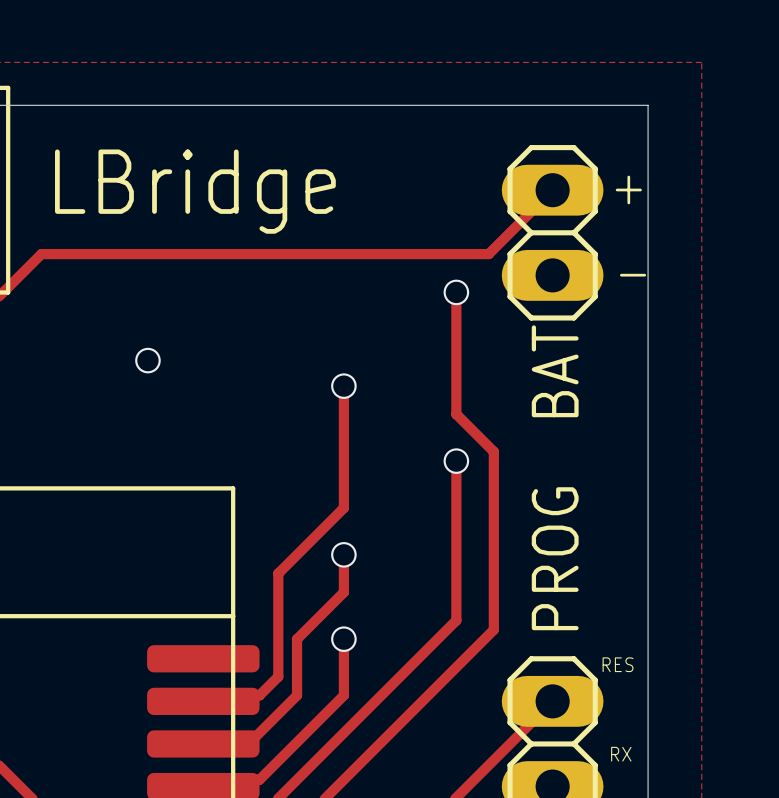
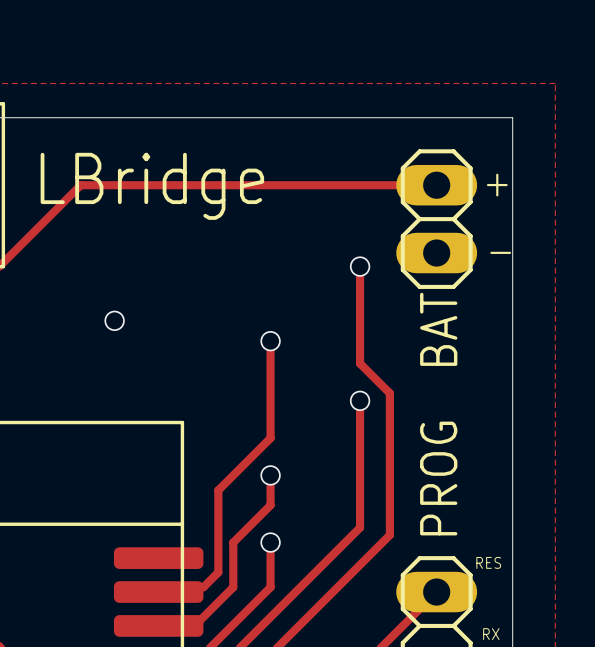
track: (552, 190) (488, 254) (41, 254) -> (436, 185) (80, 185) (29, 236)

